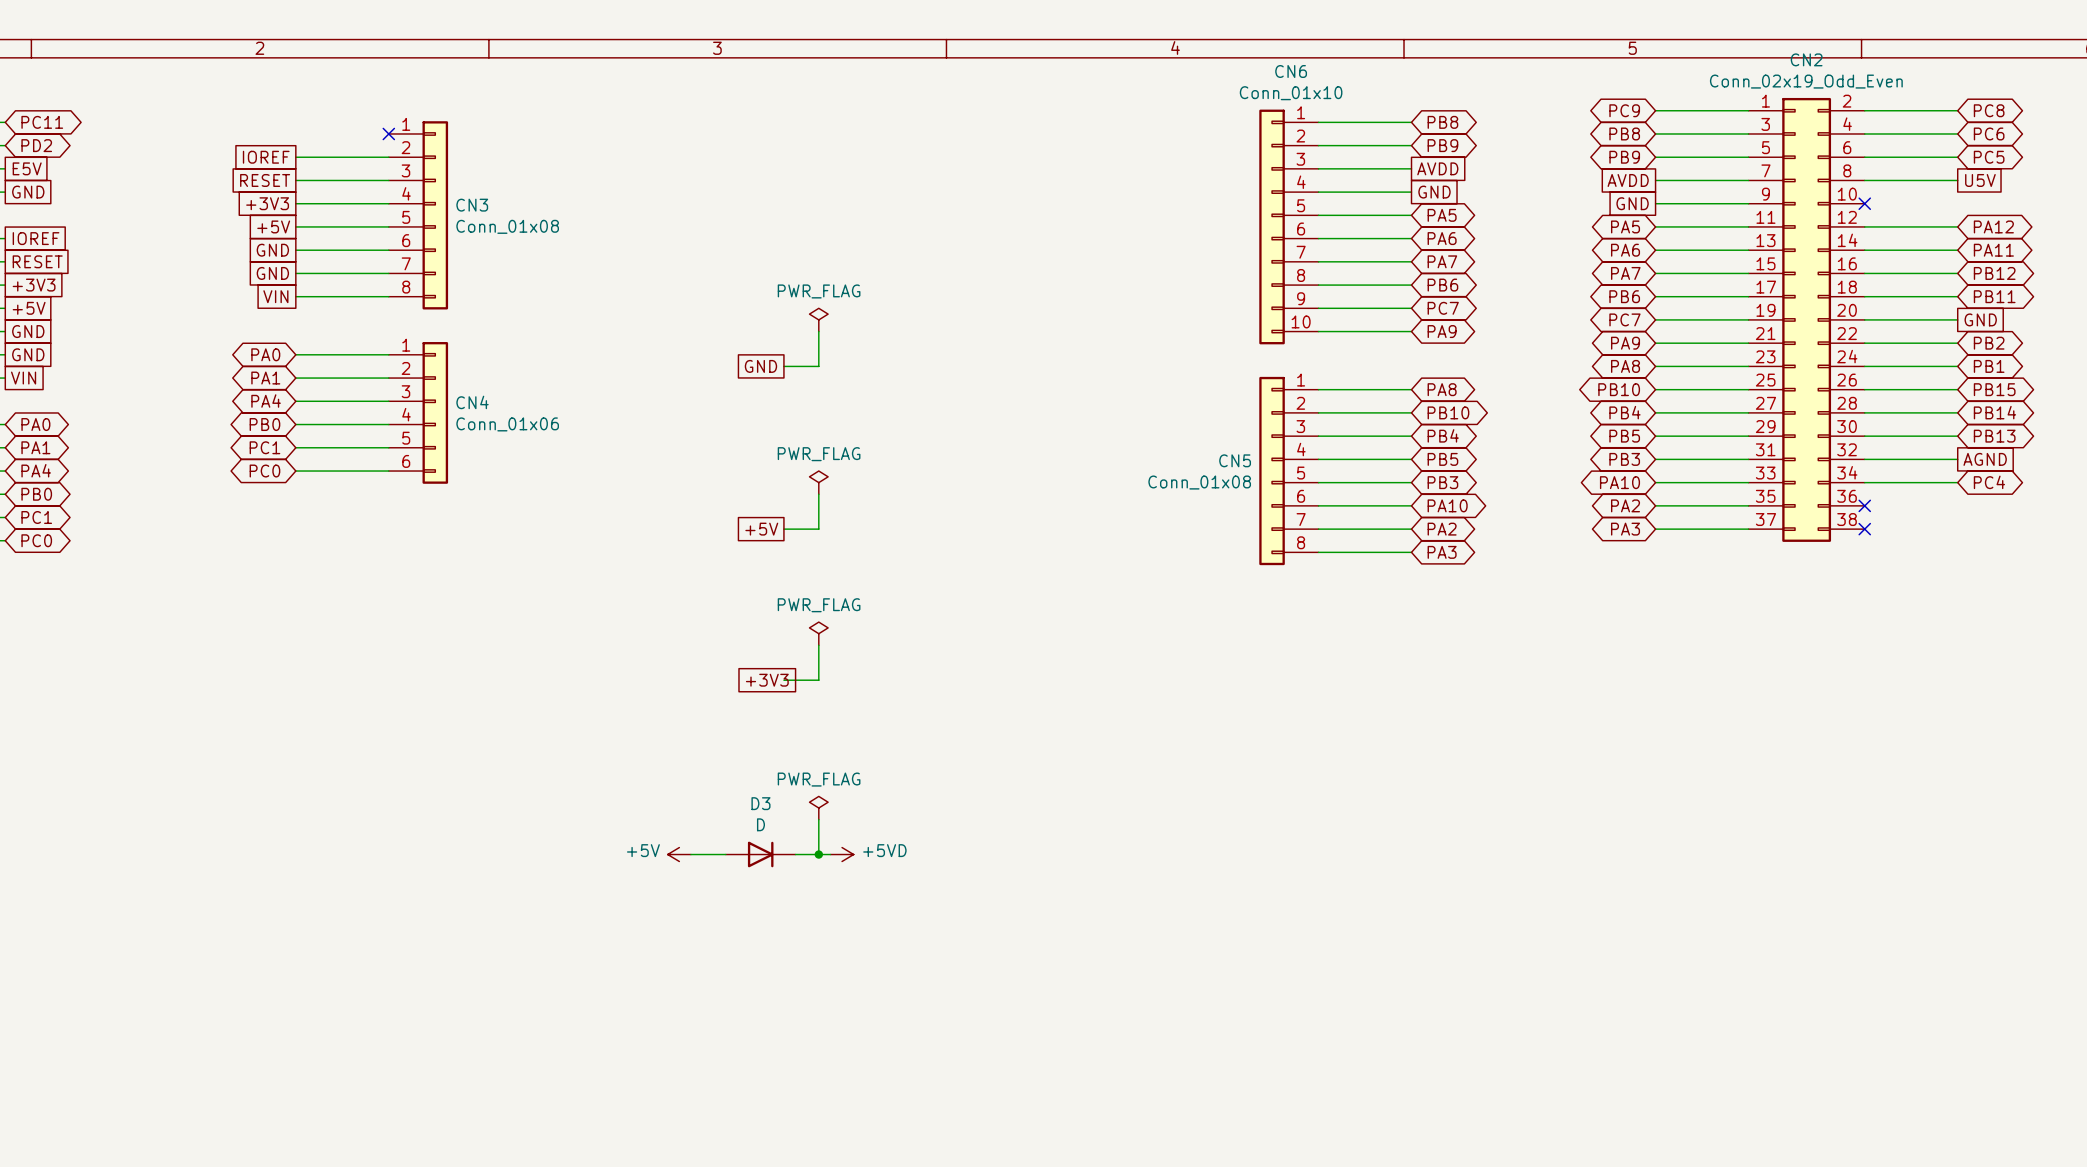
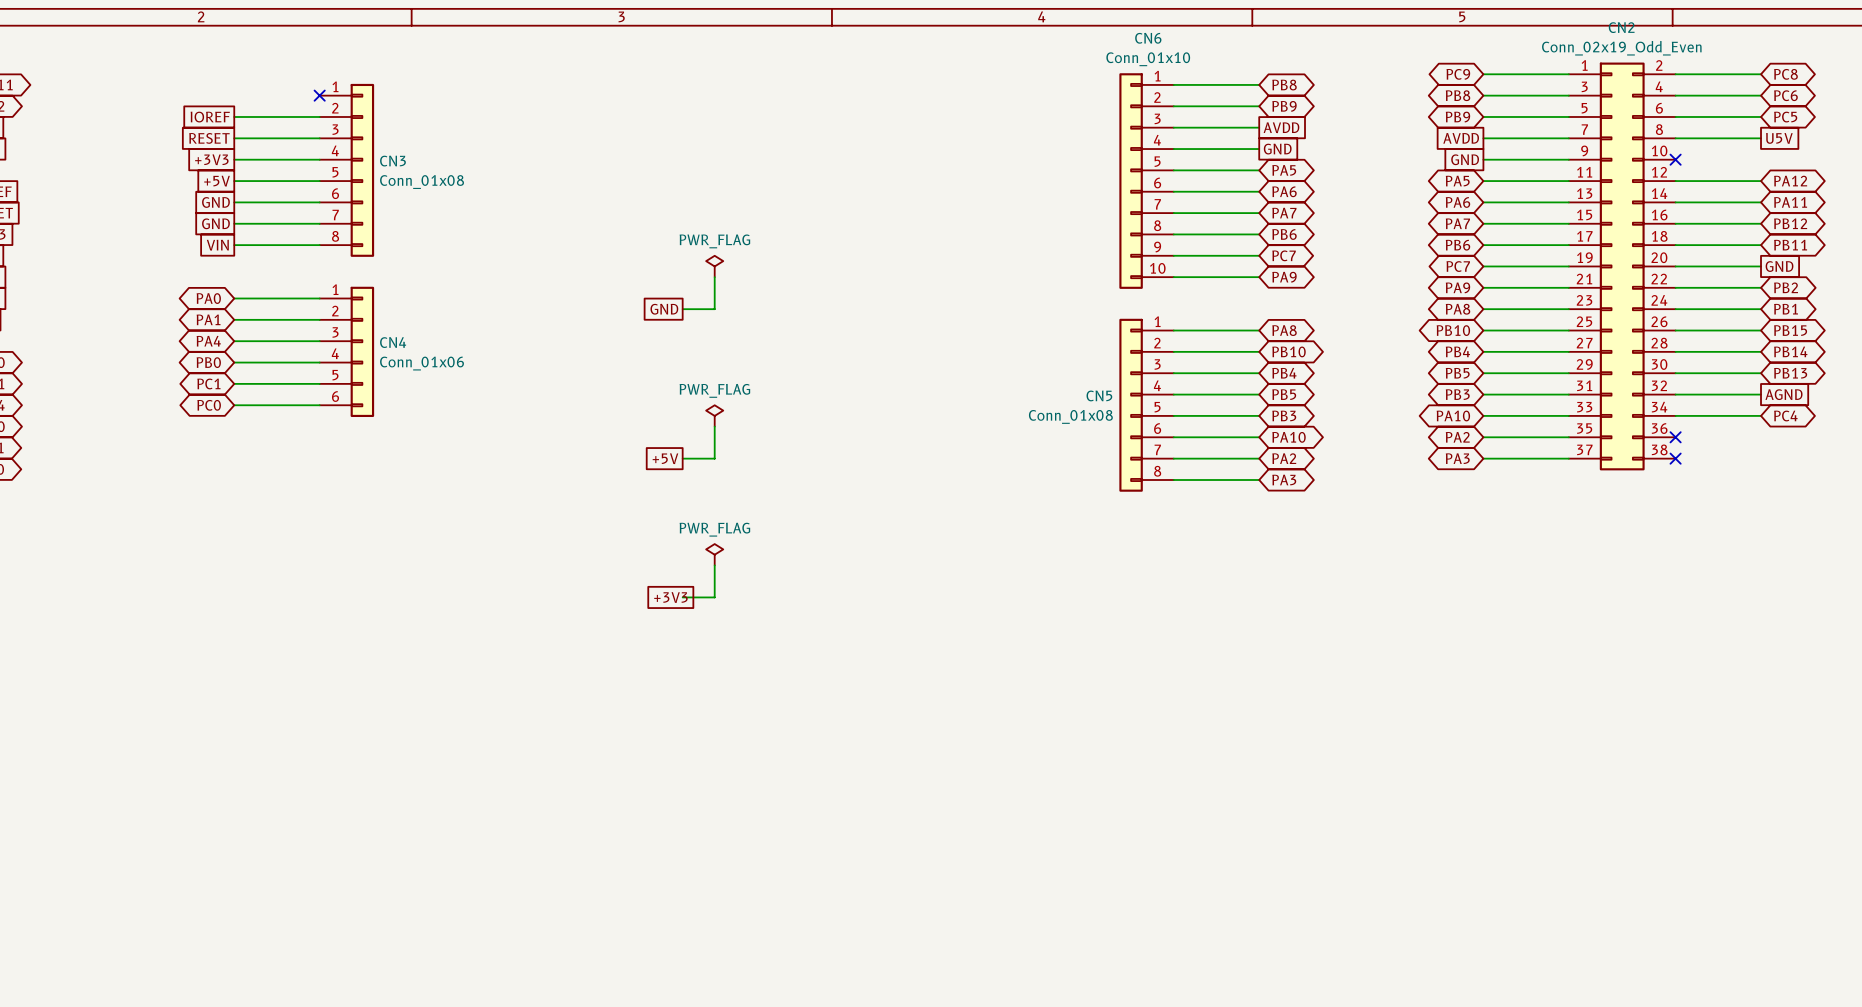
power symbol: PWR_FLAG (818, 808) -> none
wire: (818, 819) (818, 854) -> none
power symbol: +5V (679, 854) -> none
wire: (690, 854) (725, 854) -> none
D3: D (760, 854) -> none
wire: (795, 854) (830, 854) -> none
junction: (818, 854) -> none
power symbol: +5VD (842, 854) -> none

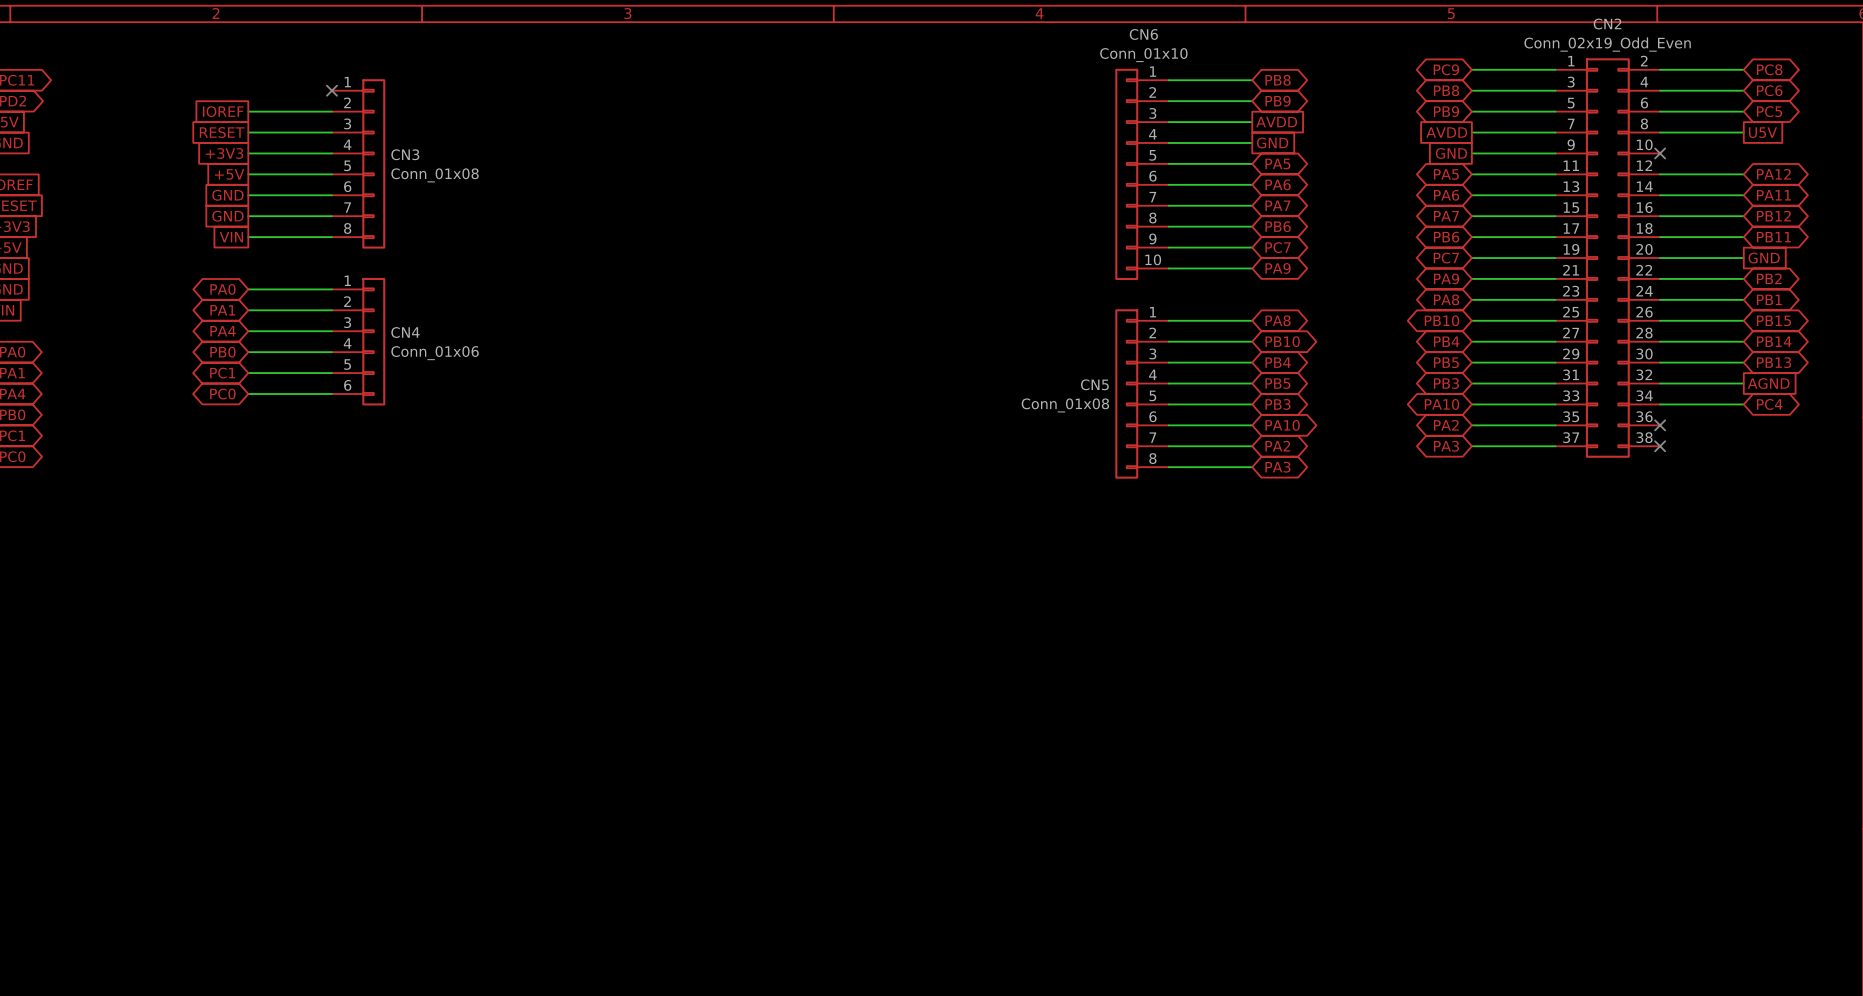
power symbol: PWR_FLAG (714, 266) -> none
wire: (714, 277) (714, 309) (682, 309) -> none
global label: GND (664, 309) -> none
power symbol: PWR_FLAG (714, 415) -> none
wire: (714, 426) (714, 458) (682, 458) -> none
global label: +5V (665, 458) -> none
power symbol: PWR_FLAG (714, 554) -> none
wire: (714, 565) (714, 597) (682, 597) -> none
global label: +3V3 (670, 597) -> none

